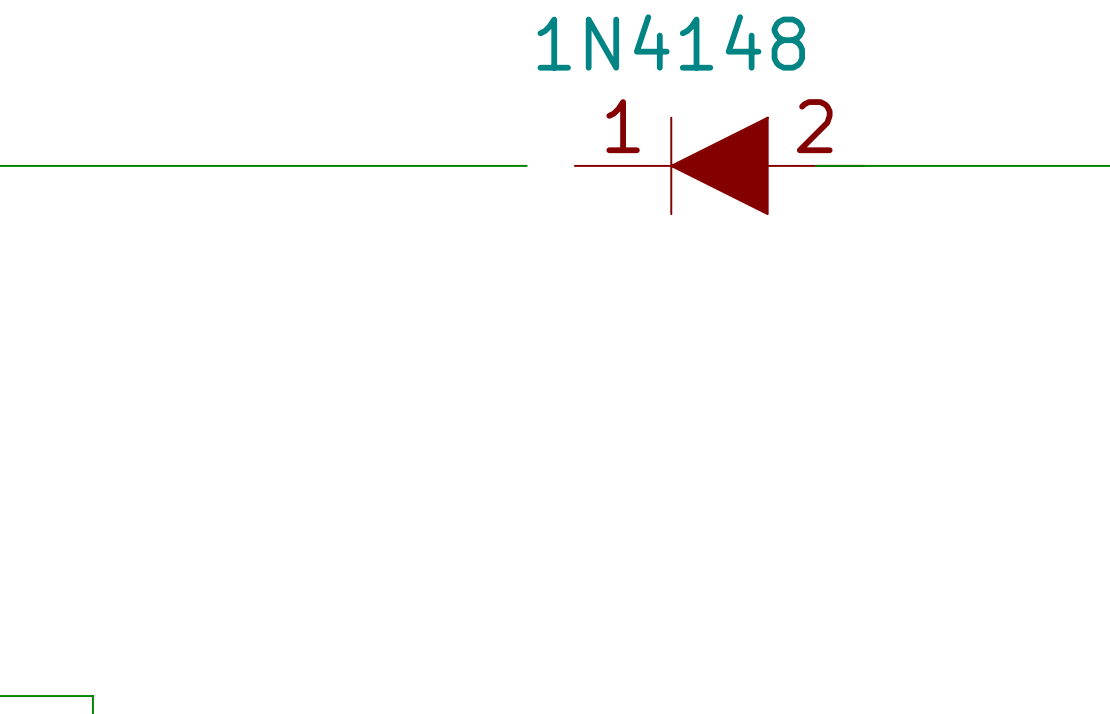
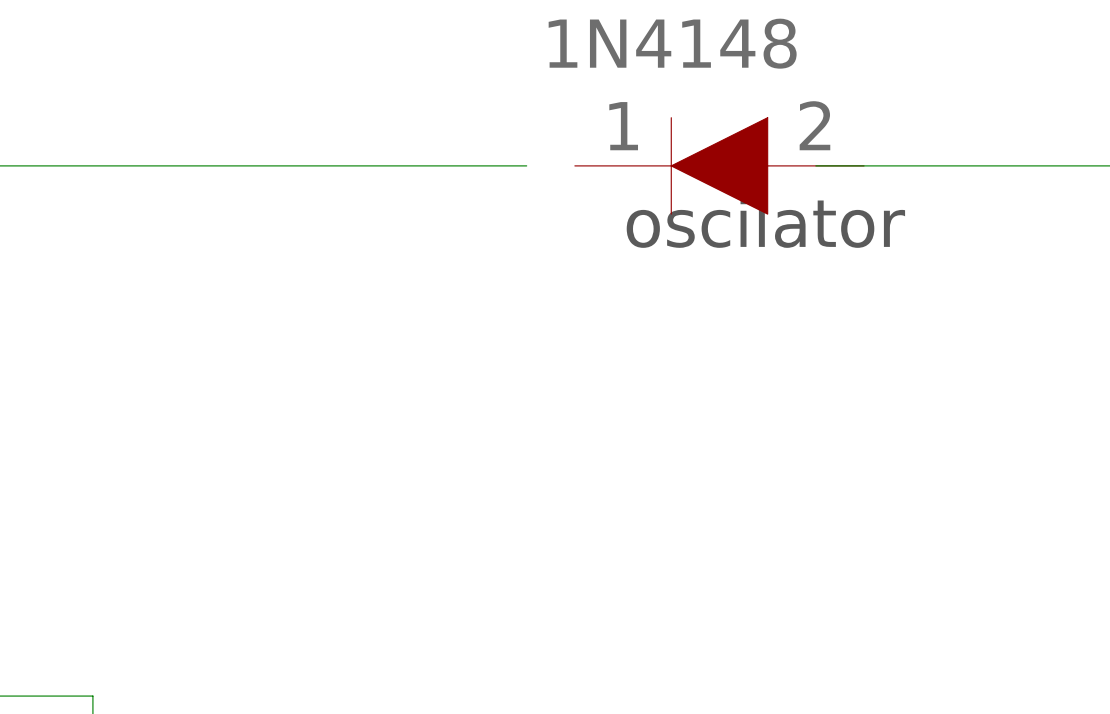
text: none -> oscilator (765, 222)

